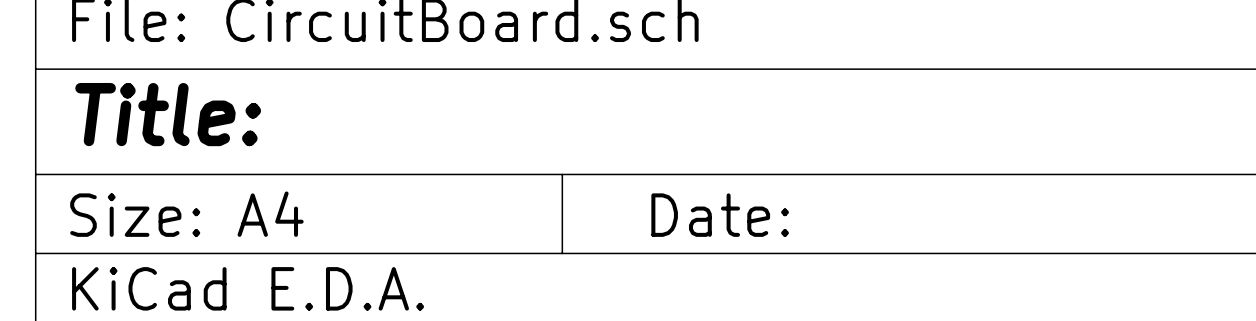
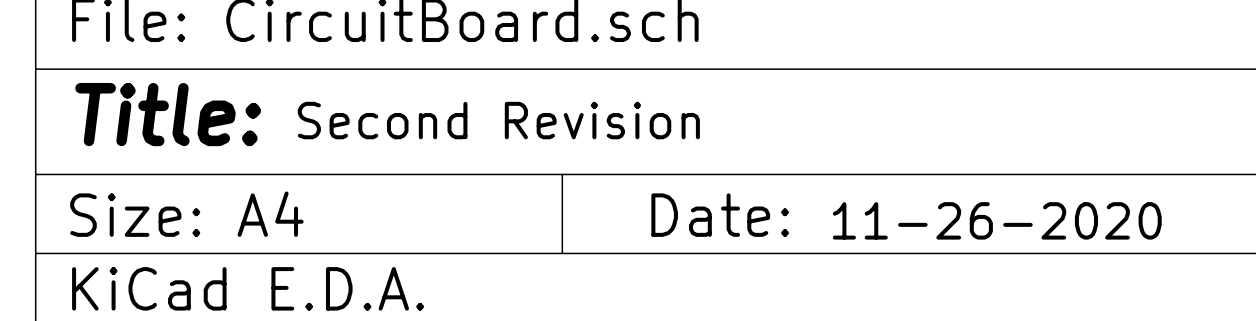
text: none -> Second Revision (498, 120)
text: none -> 11-26-2020 (997, 220)

